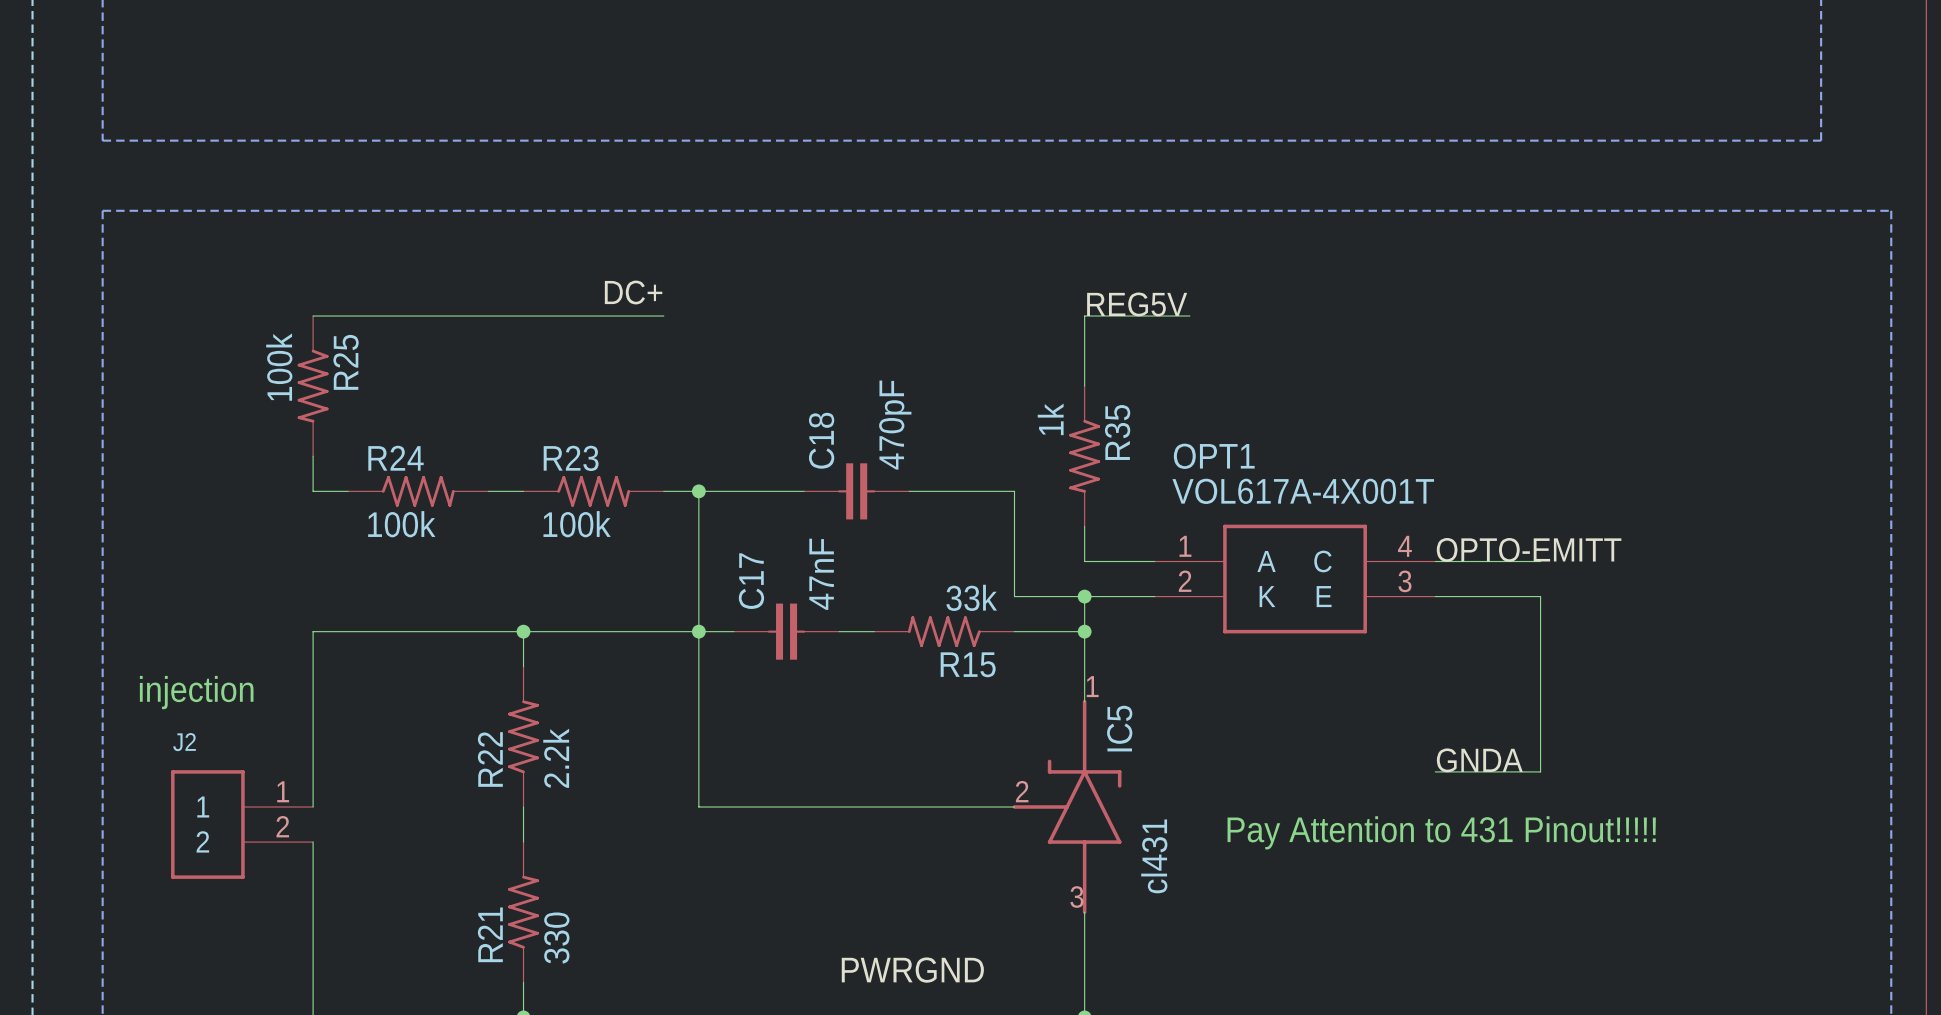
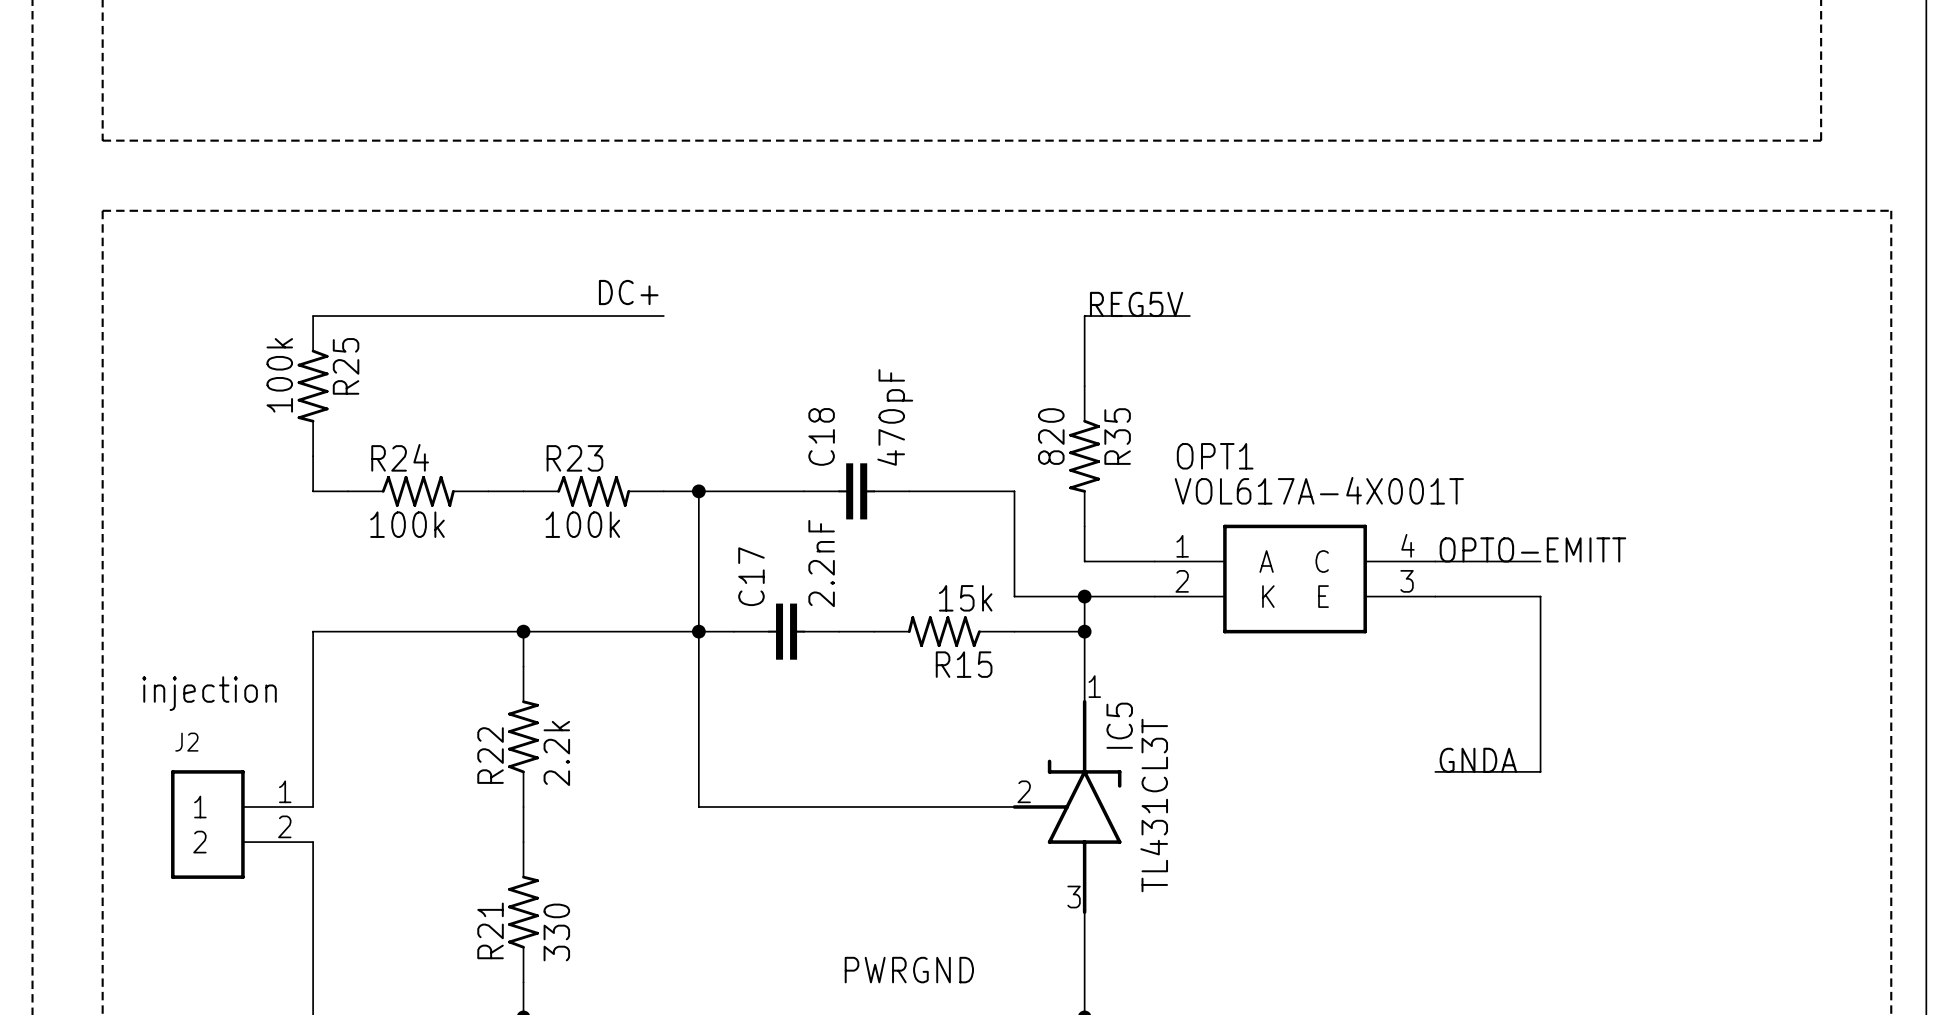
R35 value: 1k (1050, 419) -> 820 (1051, 436)
C17 value: 47nF (821, 574) -> 2.2nF (821, 563)
R15 value: 33k (971, 597) -> 15k (965, 598)
text: Pay Attention to 431 Pinout!!!!! (1441, 832) -> none
IC5 value: cl431 (1154, 856) -> TL431CL3T (1154, 805)

